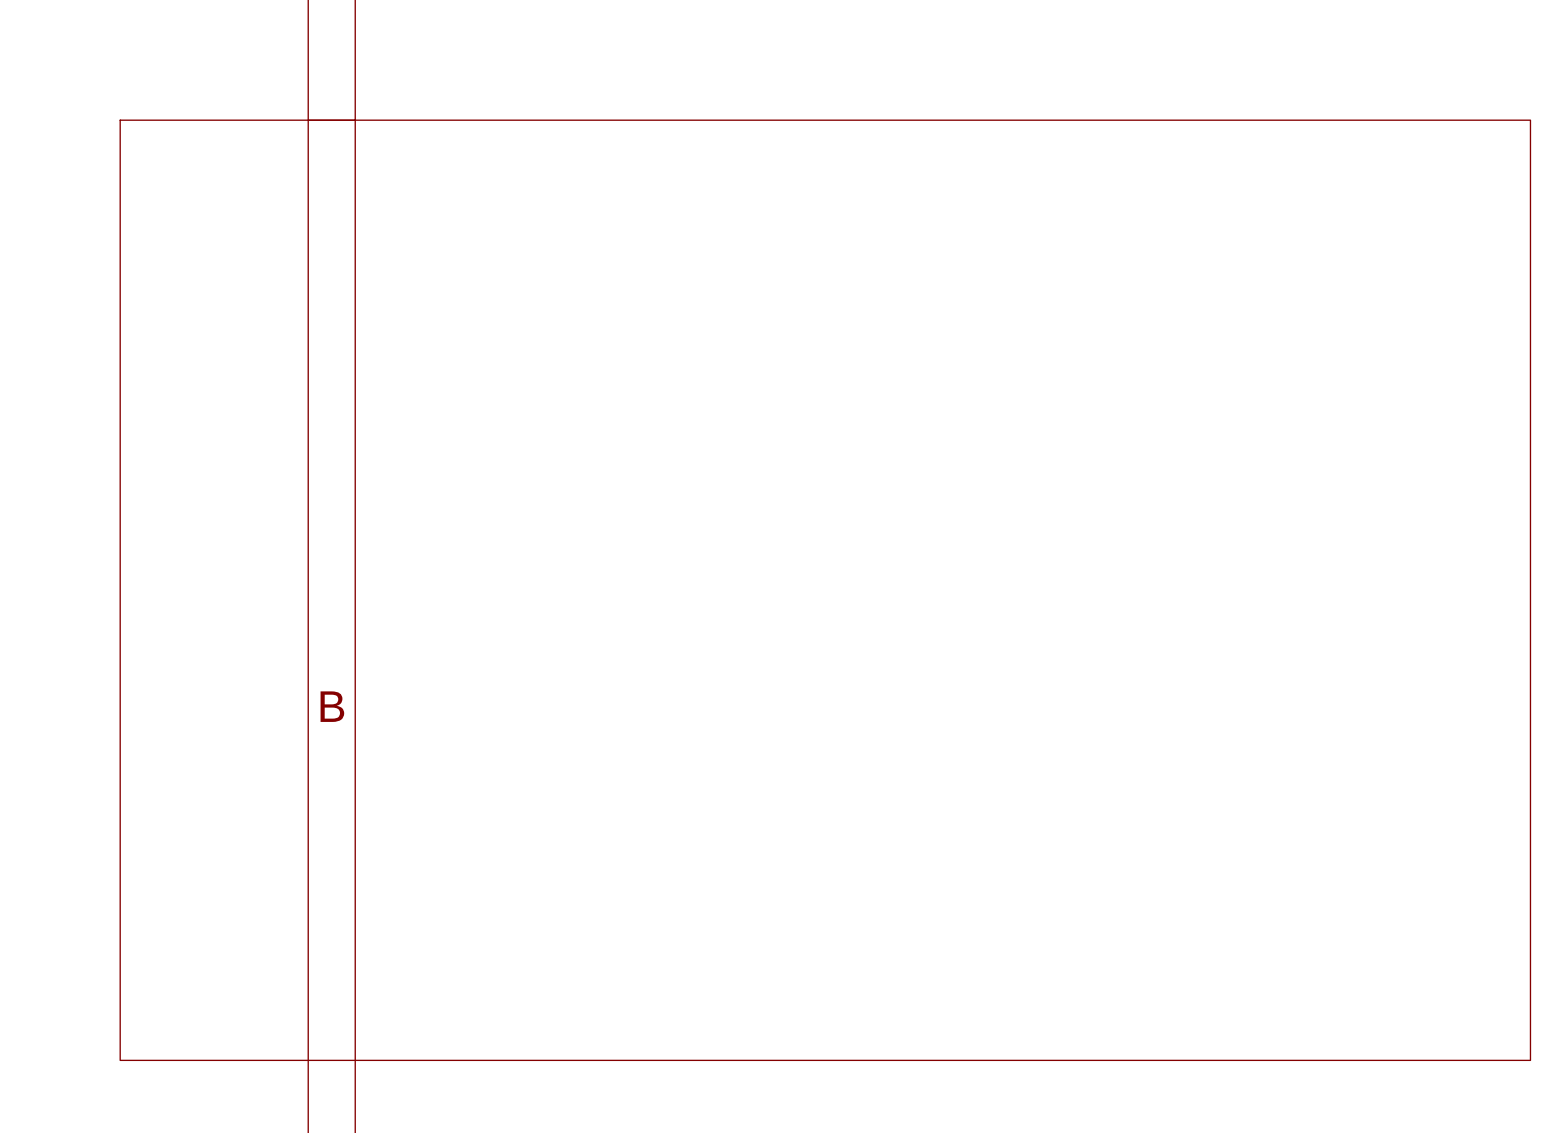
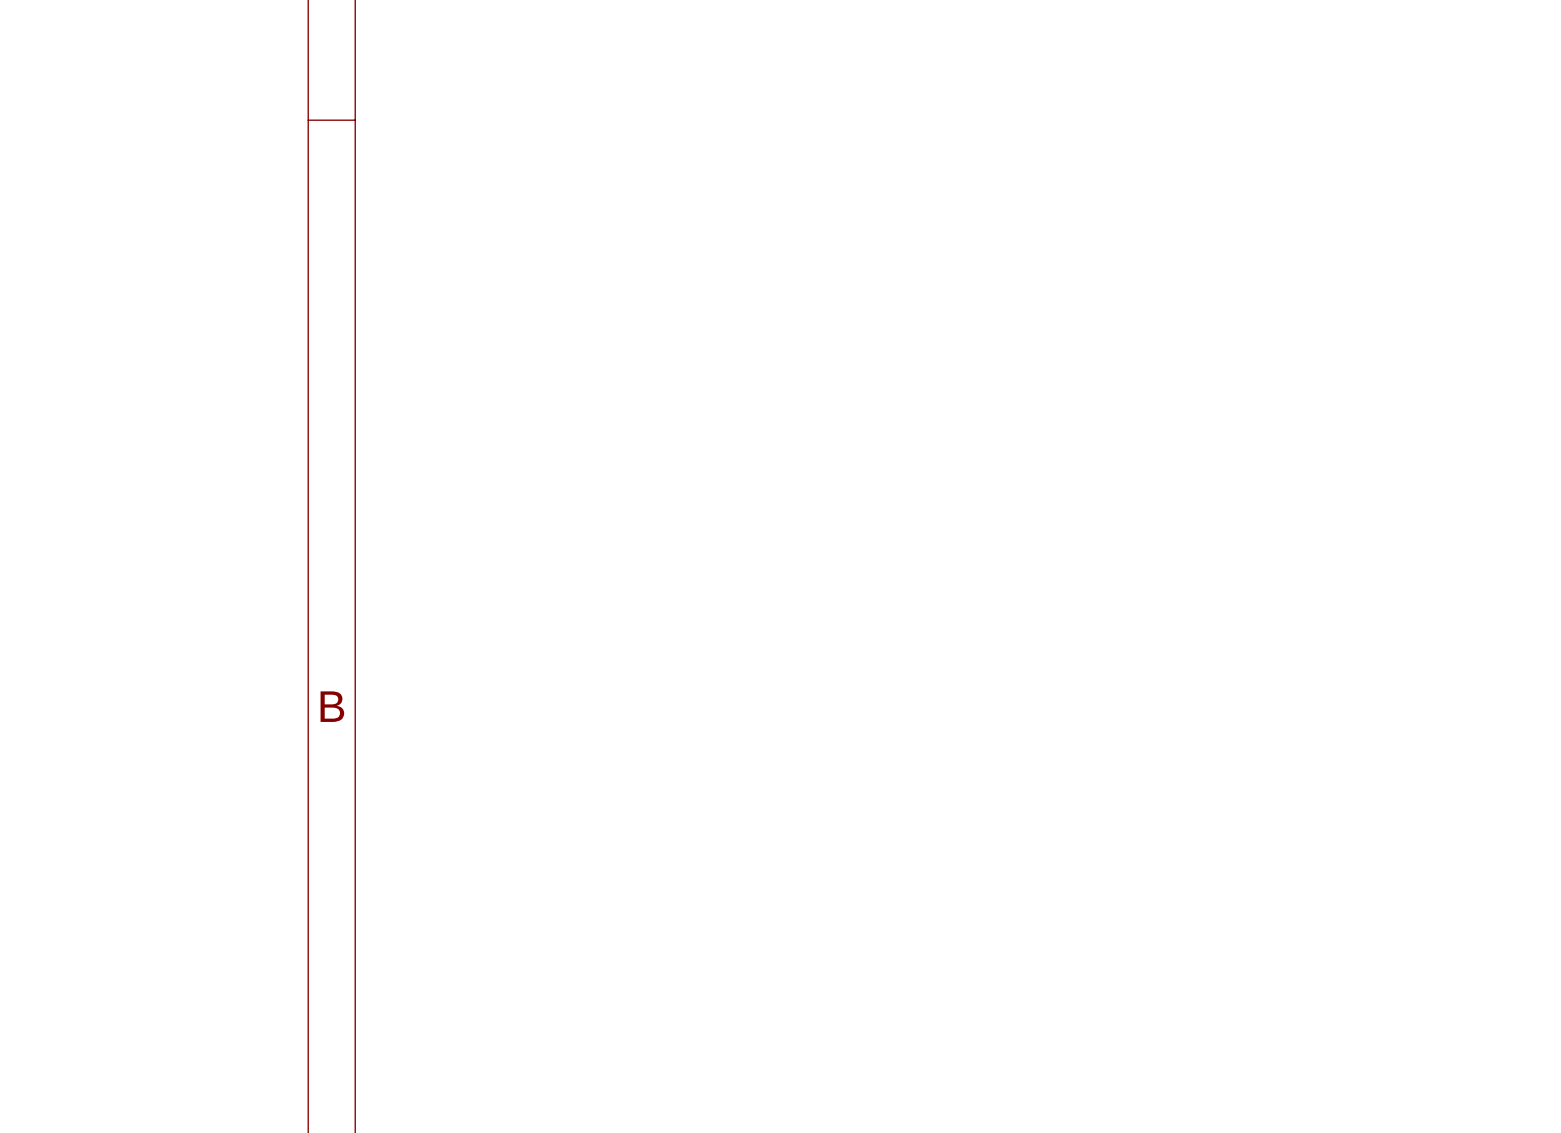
sheet: (825, 590) -> none

